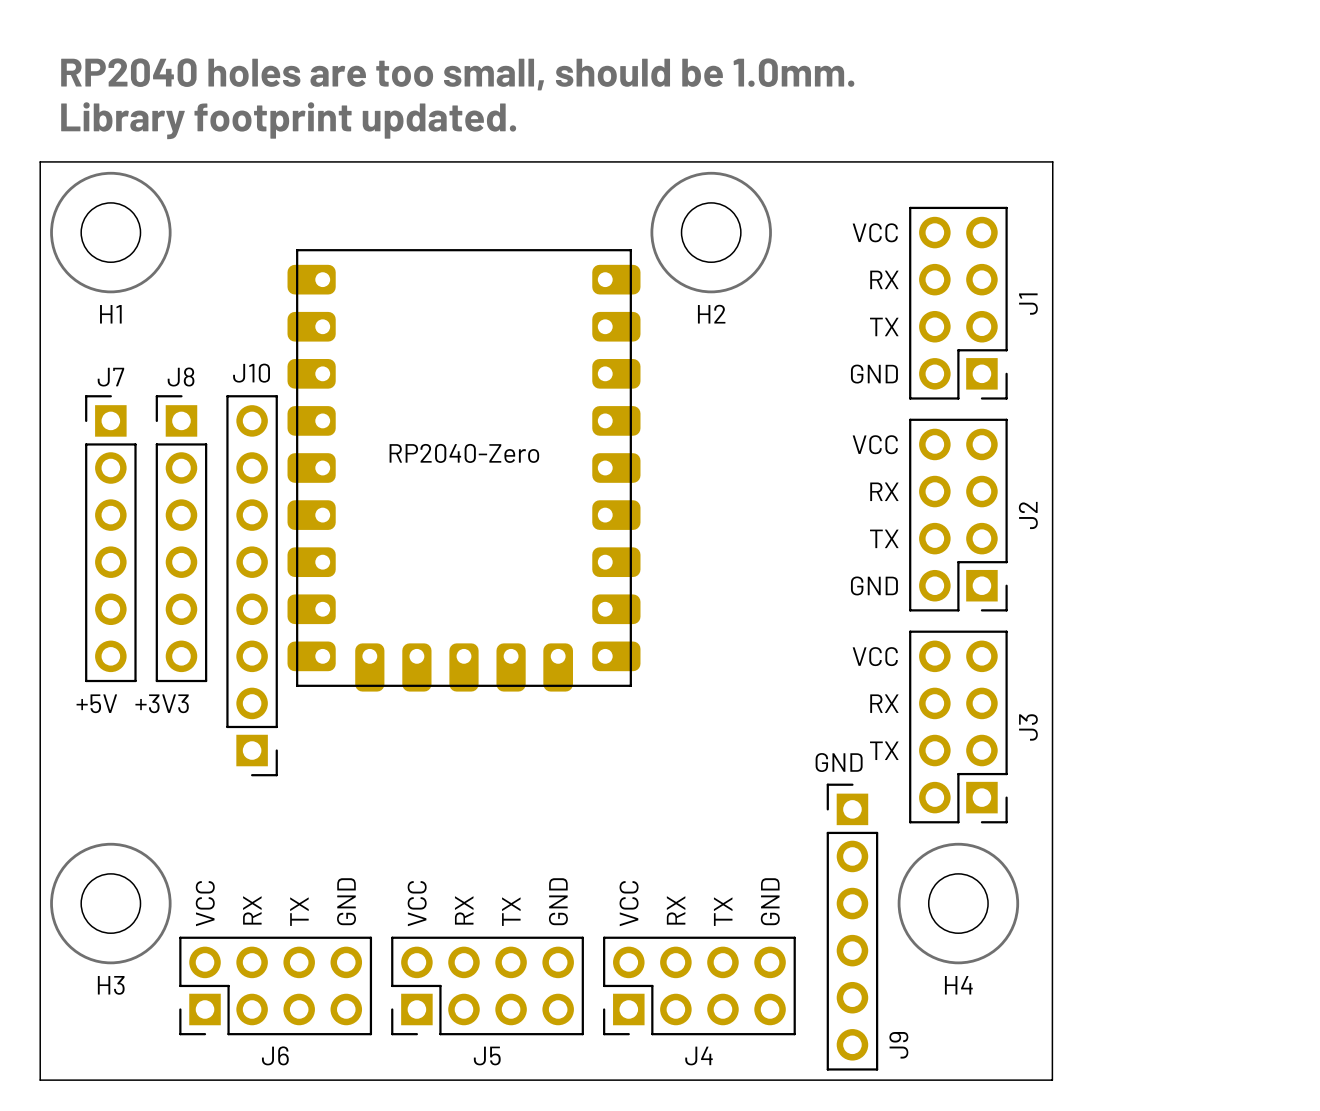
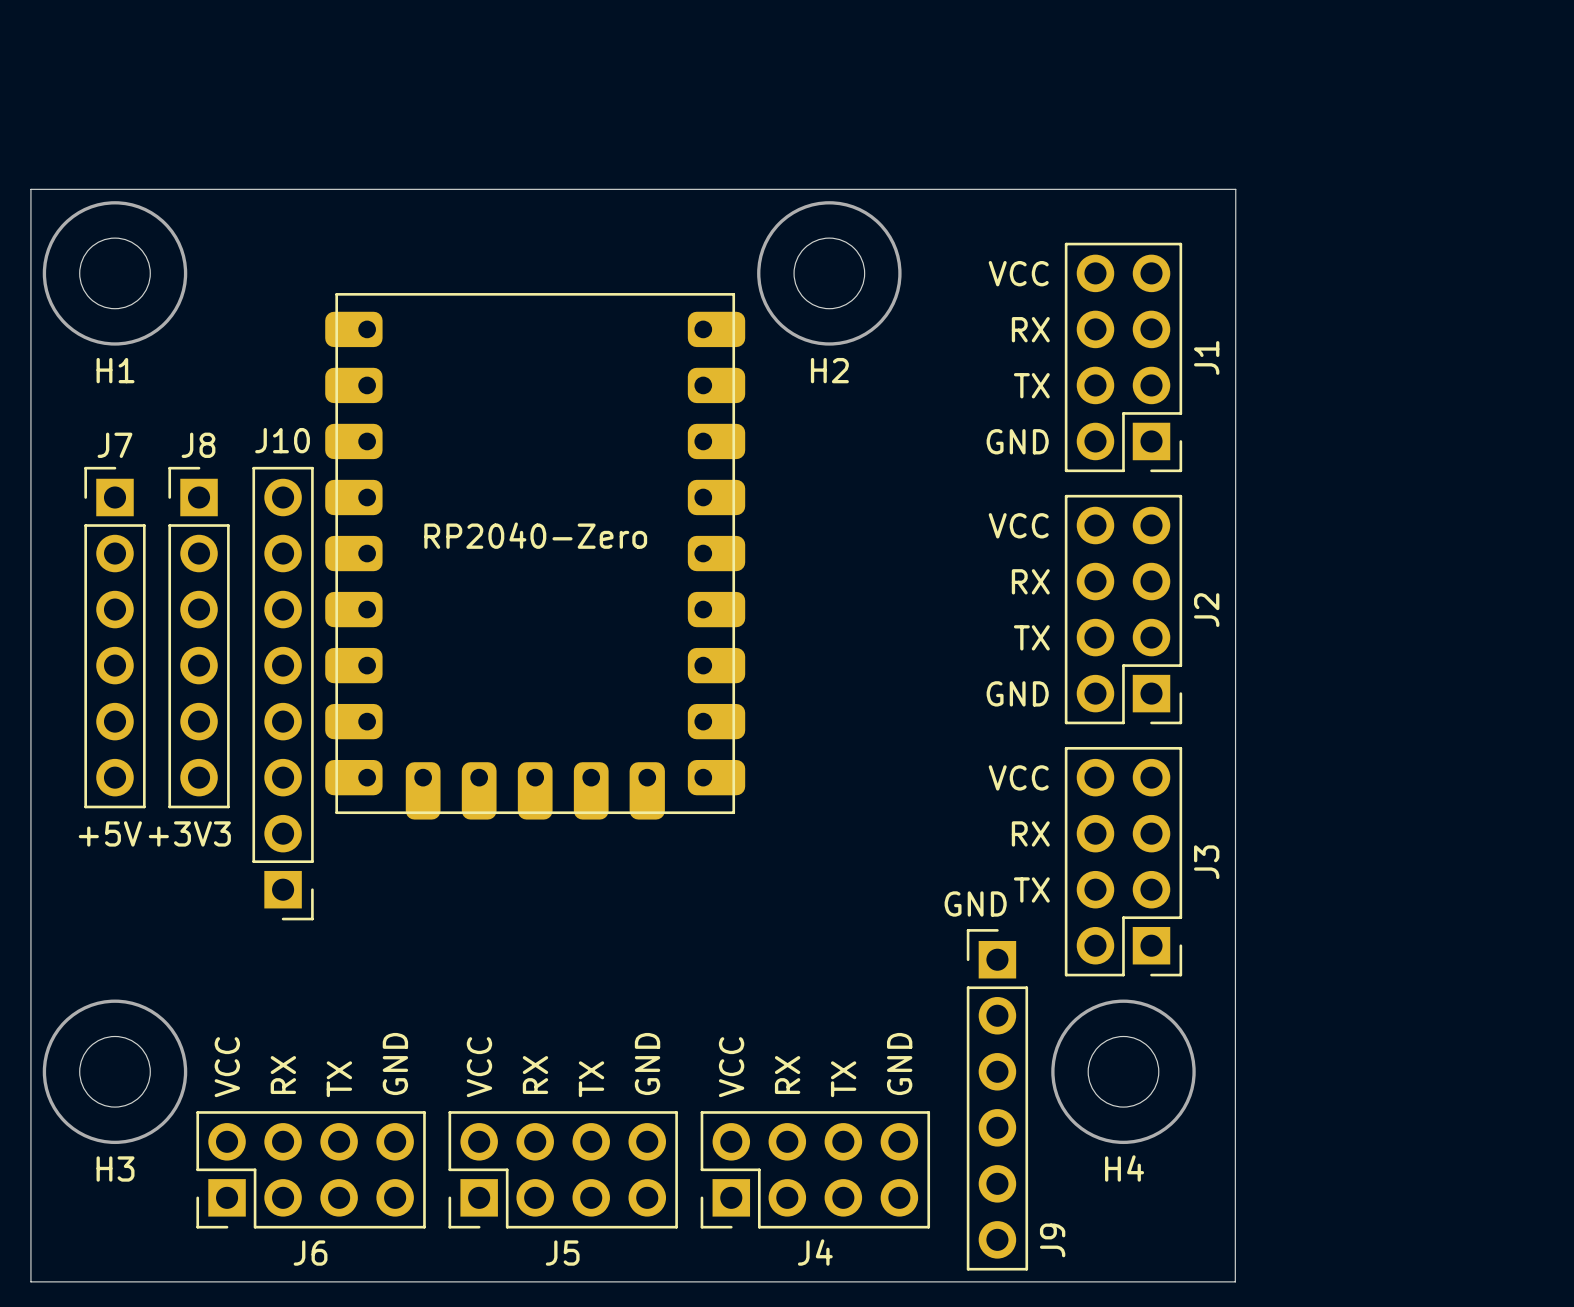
text: RP2040 holes are too small, should be 1.0mm. (457, 74) -> none
text: Library footprint updated. (288, 120) -> none

